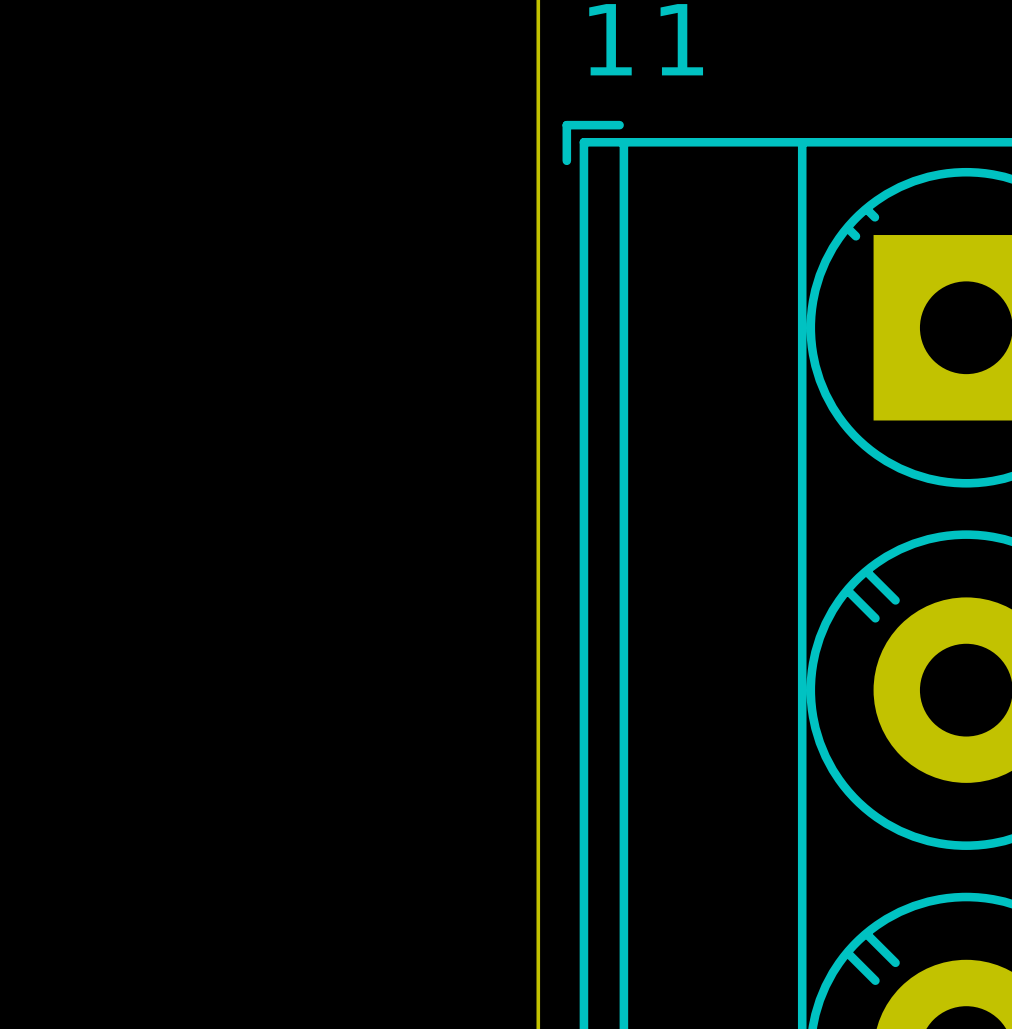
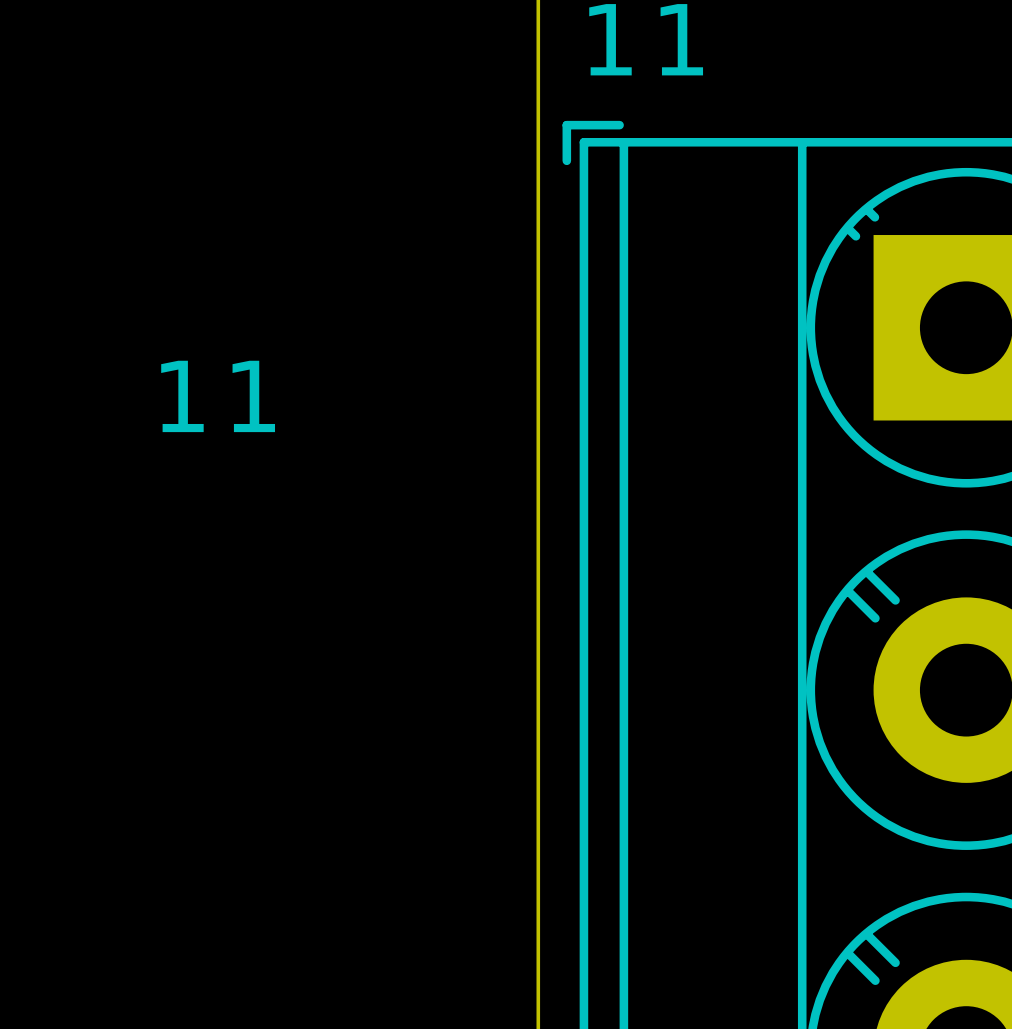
text: none -> 1 (182, 396)
text: none -> 1 (253, 396)

